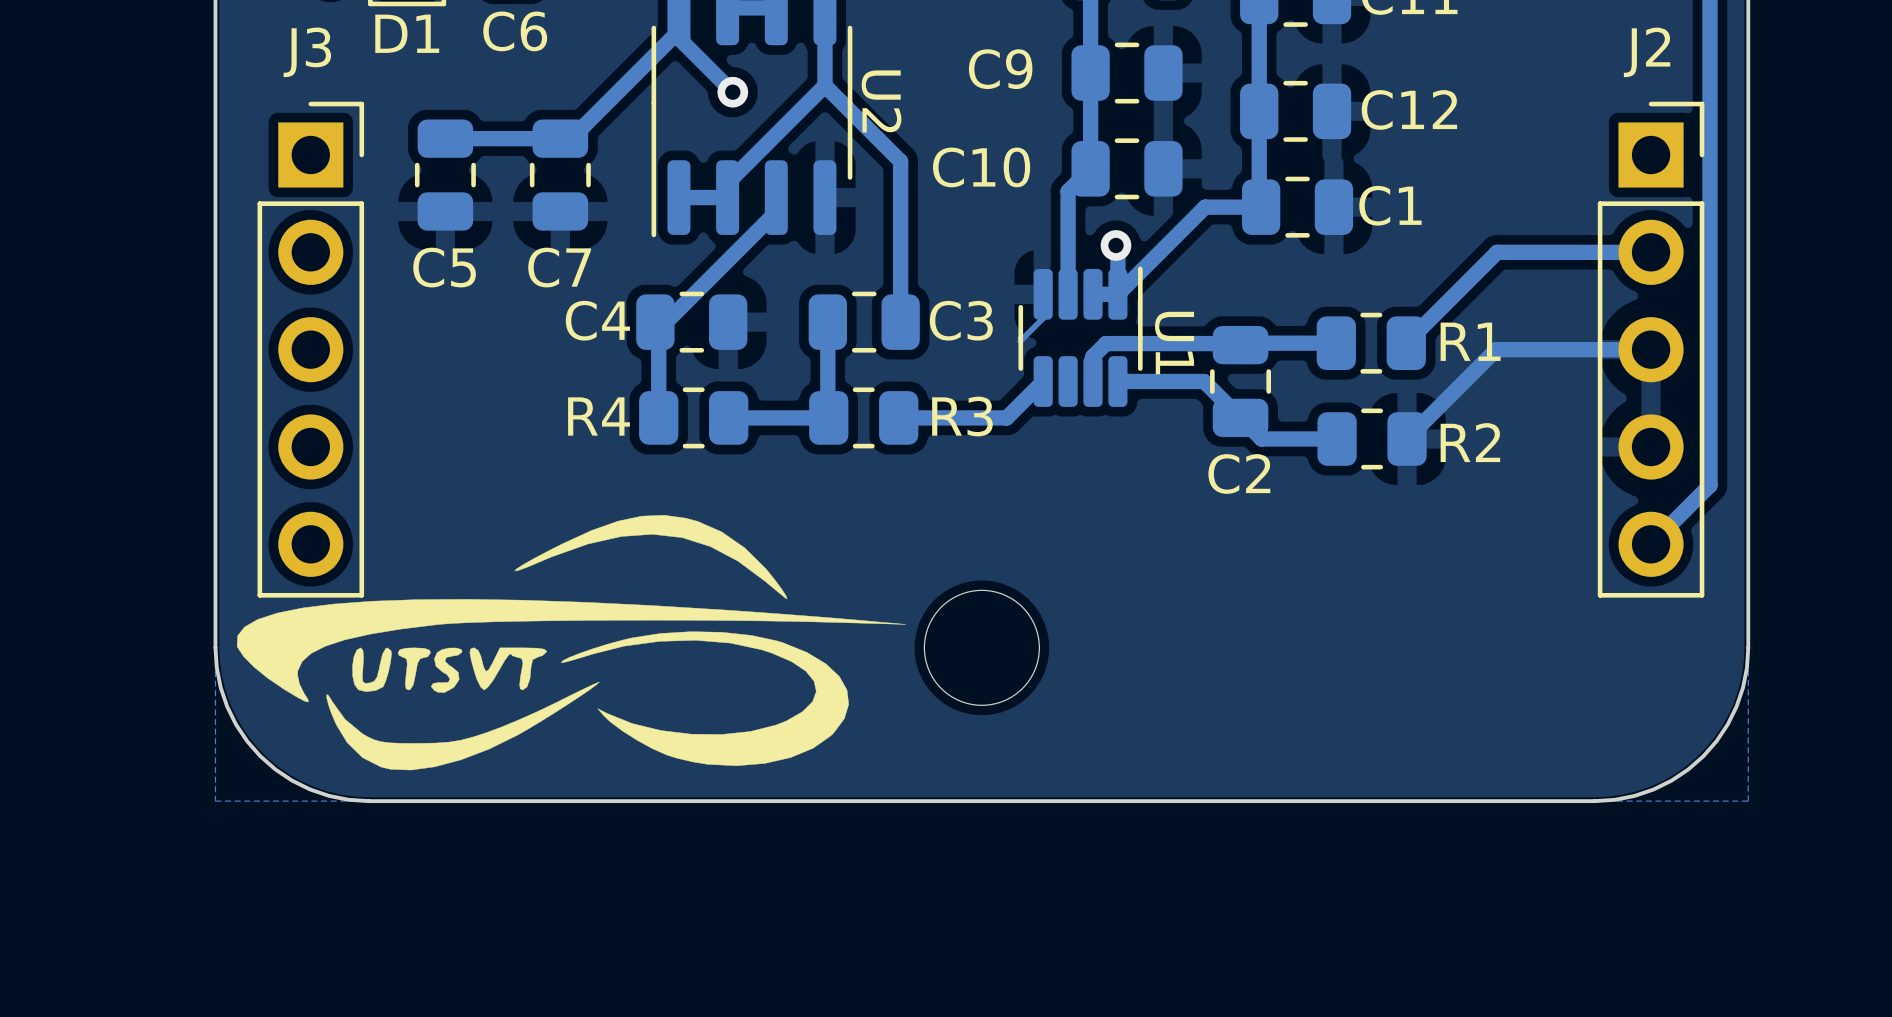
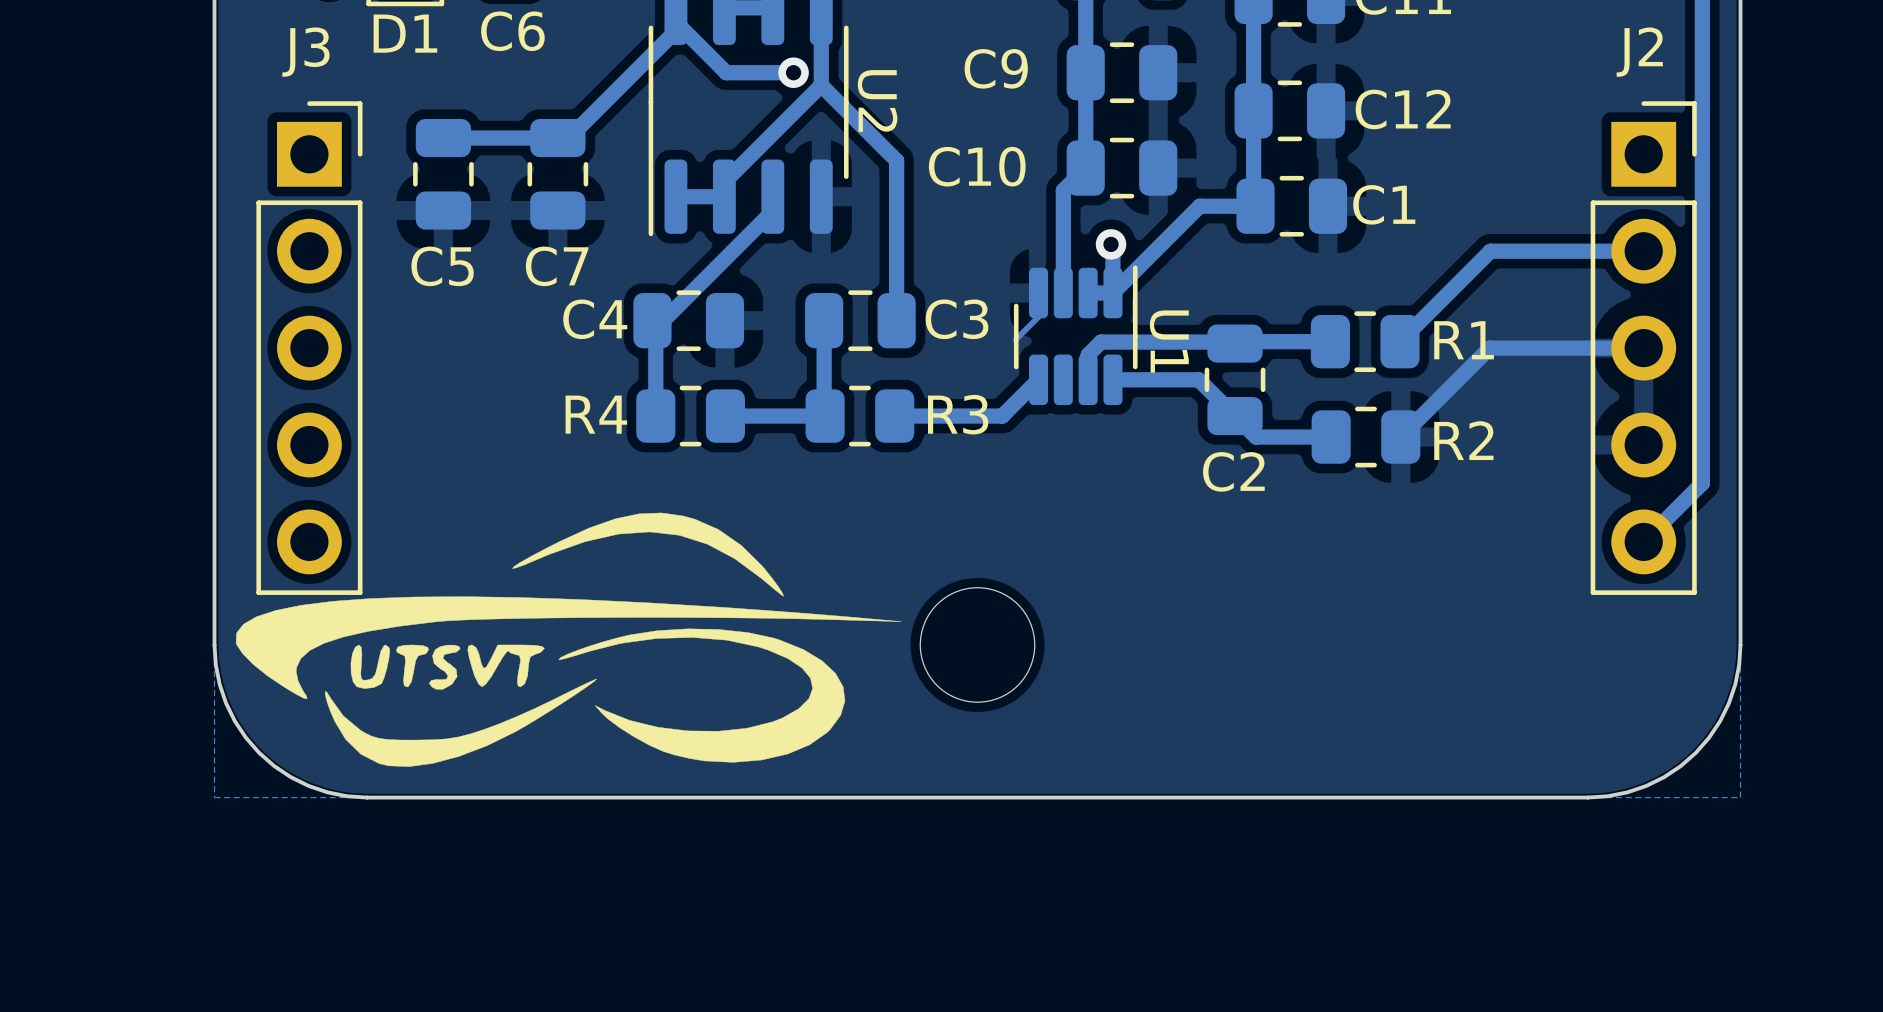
track: (678, 22) (678, 38) (732, 92) -> (675, 22) (726, 72) (793, 72)
via position: (732, 92) -> (793, 72)

